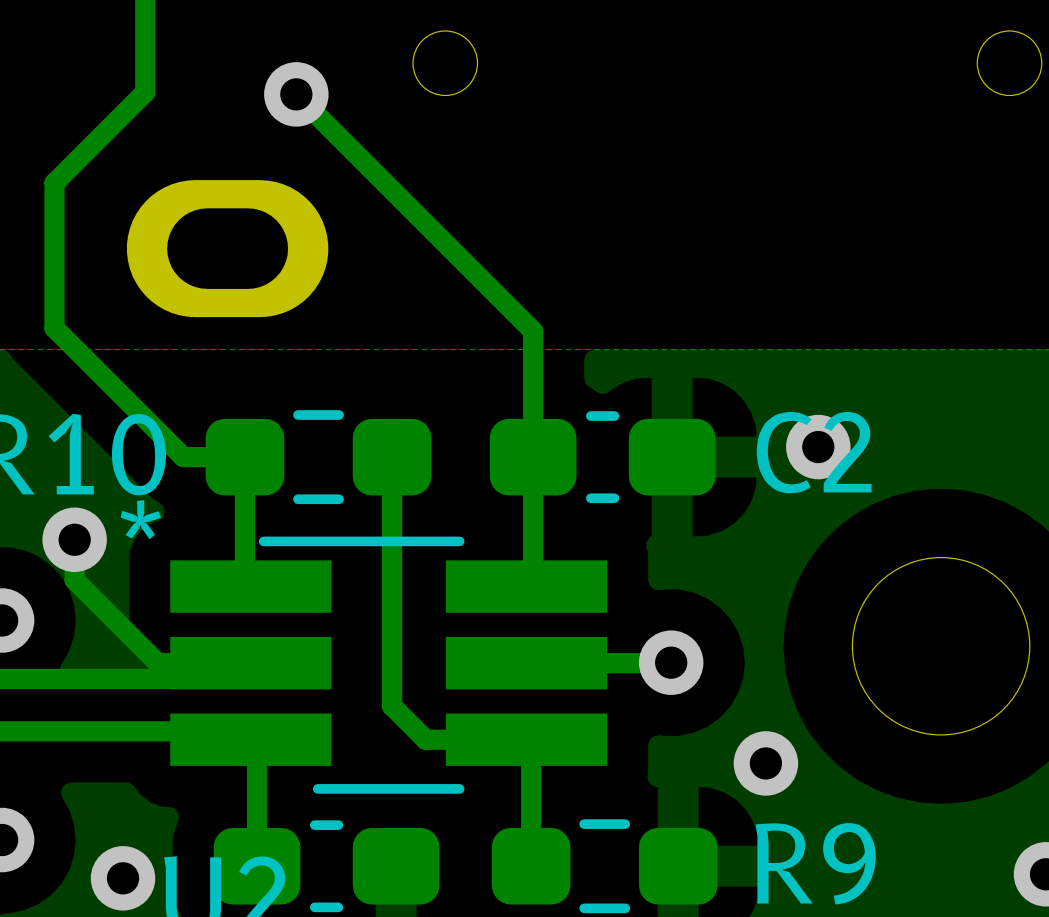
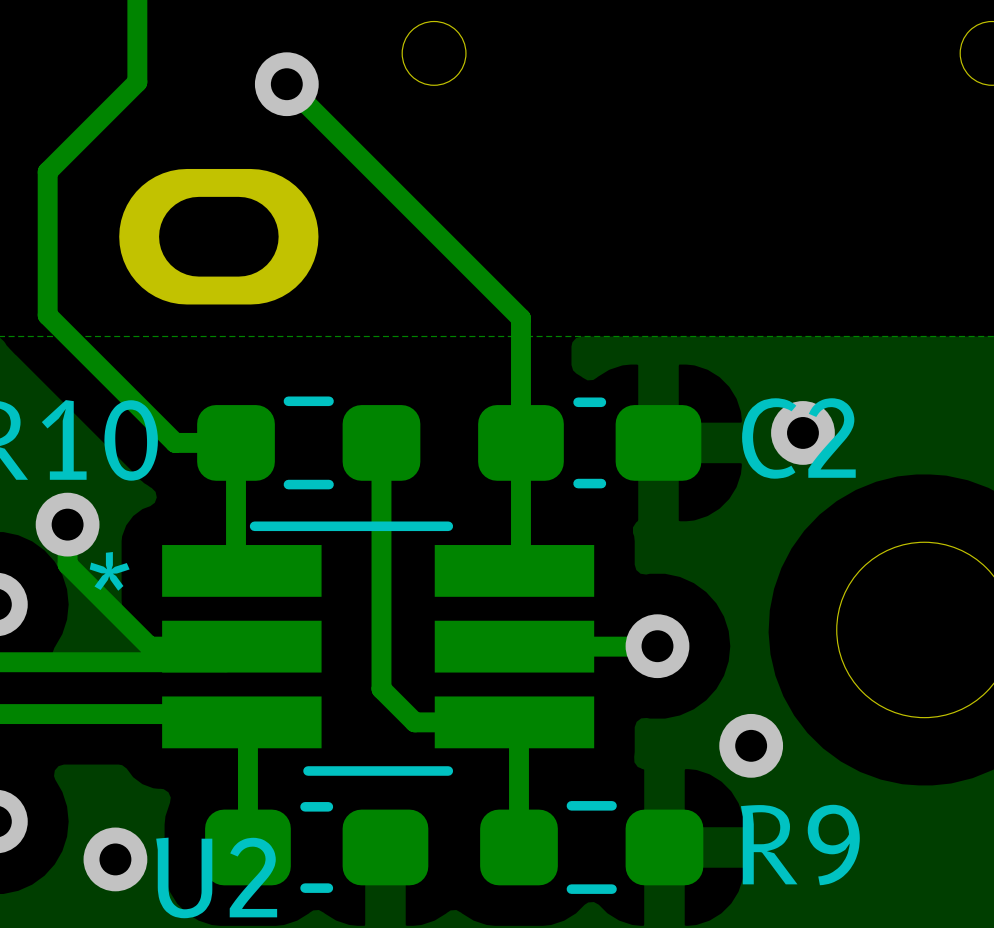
text position: * (140, 519) -> * (109, 571)

